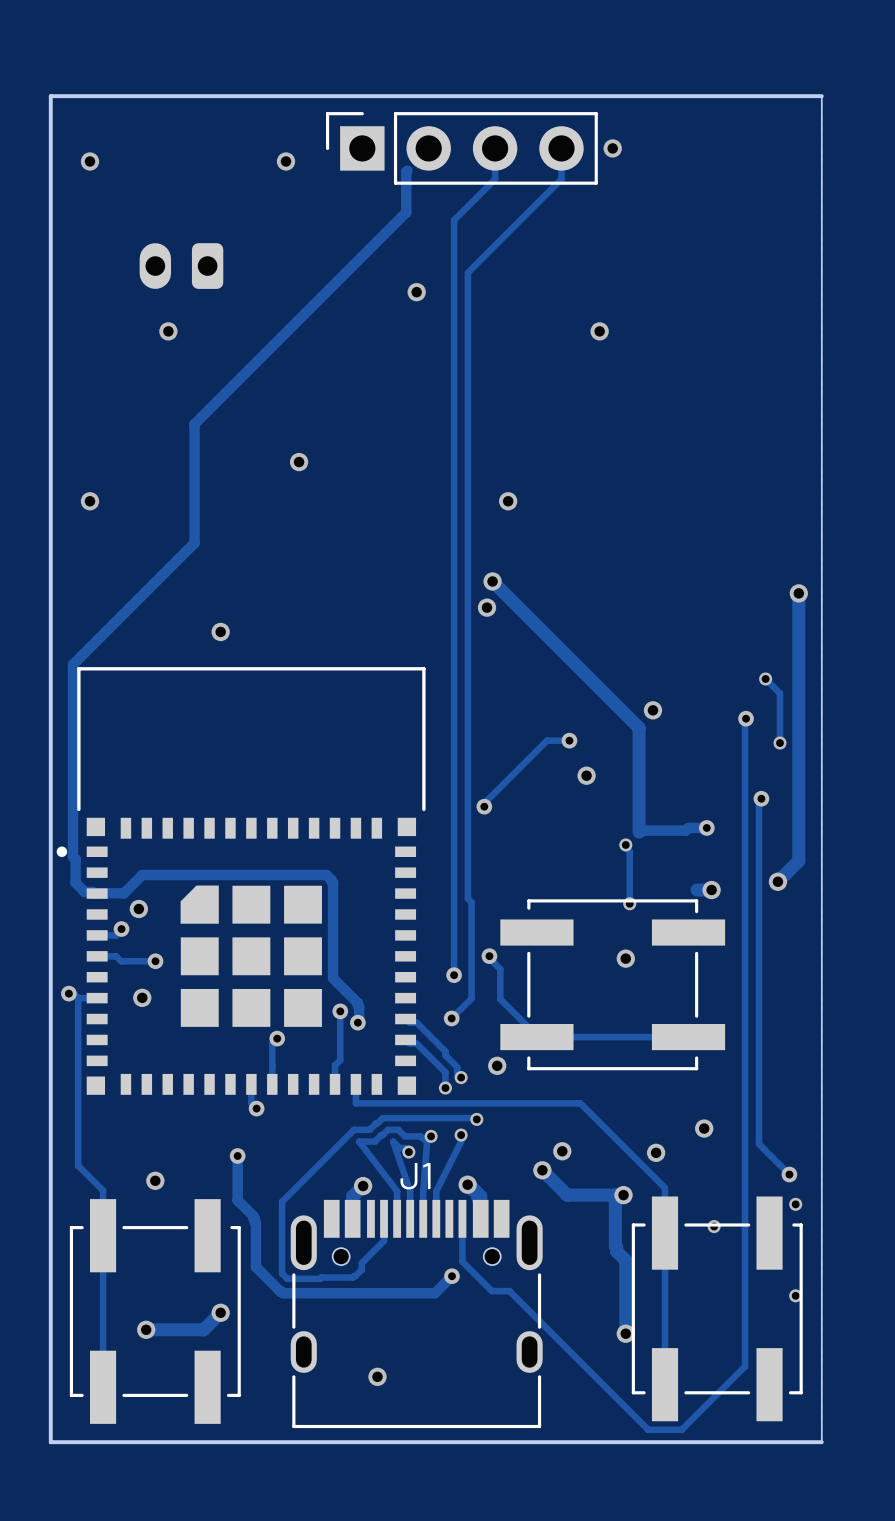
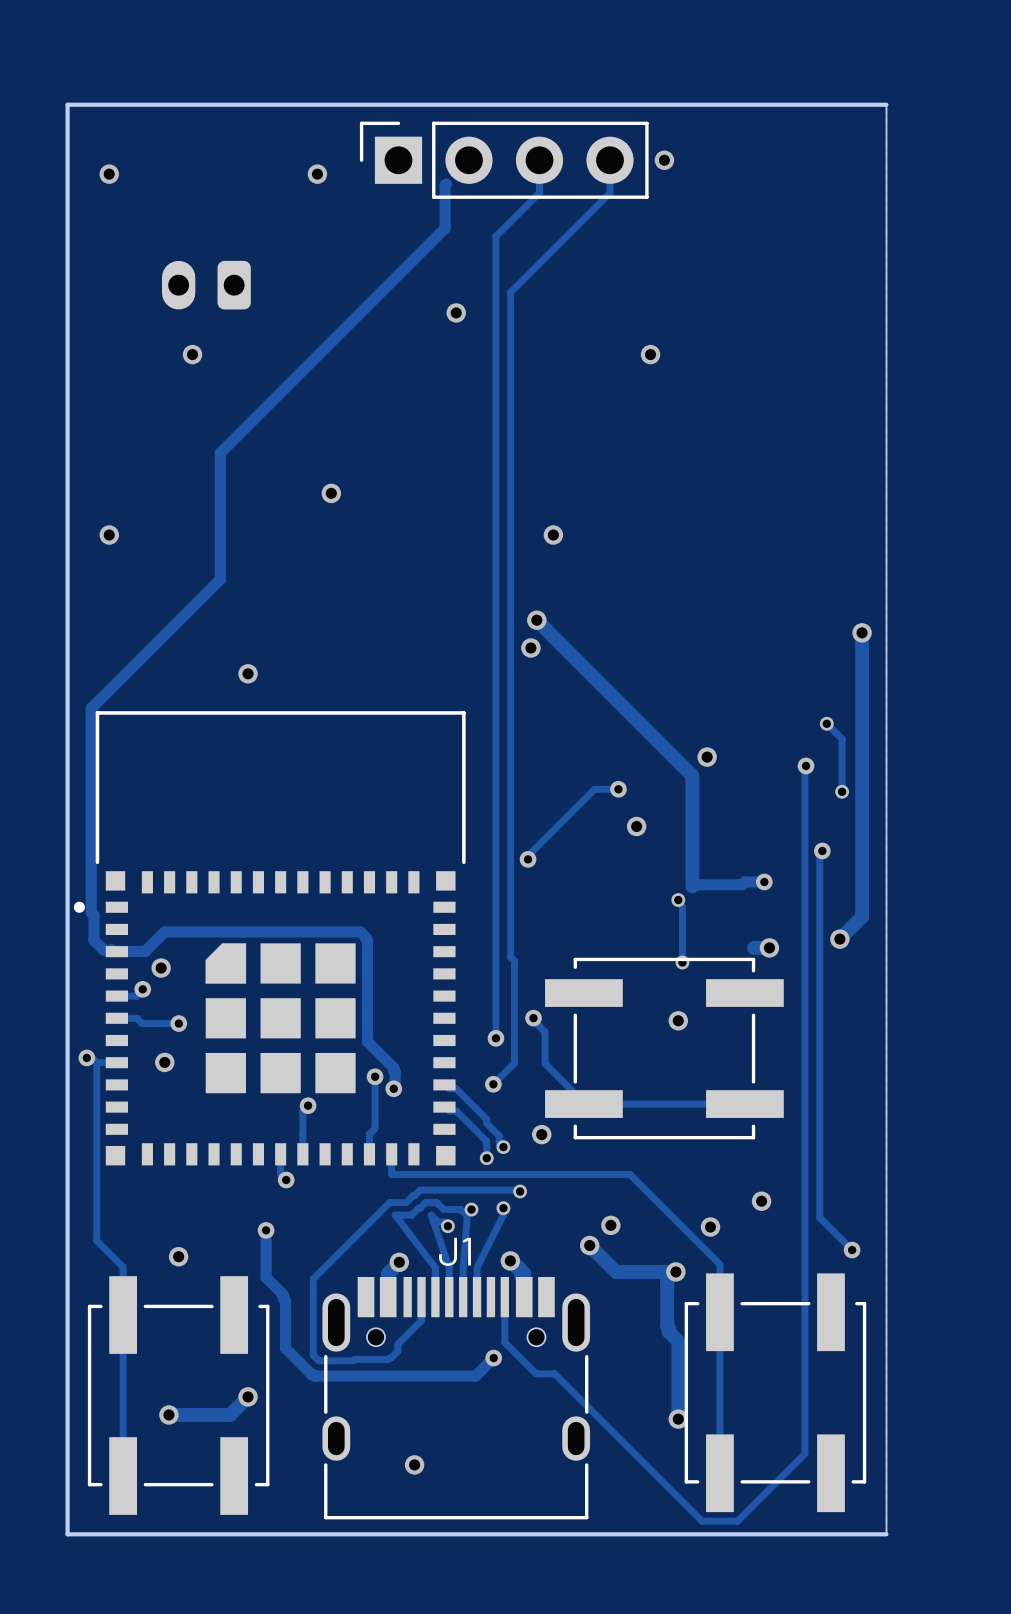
via: (795, 1204) -> none
via: (714, 1226) -> none
via: (795, 1295) -> none

